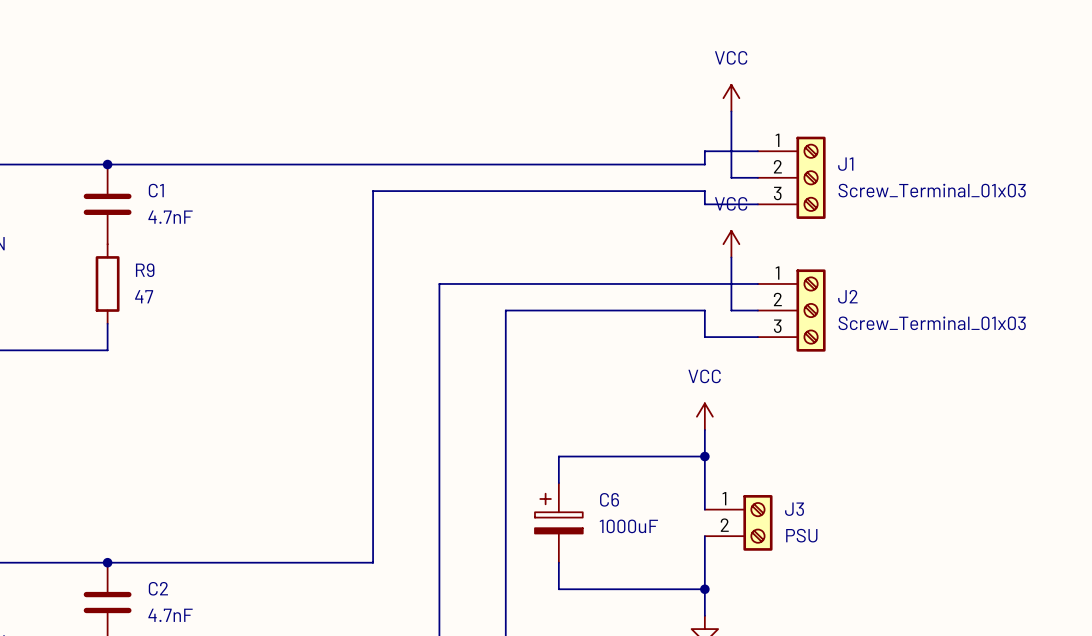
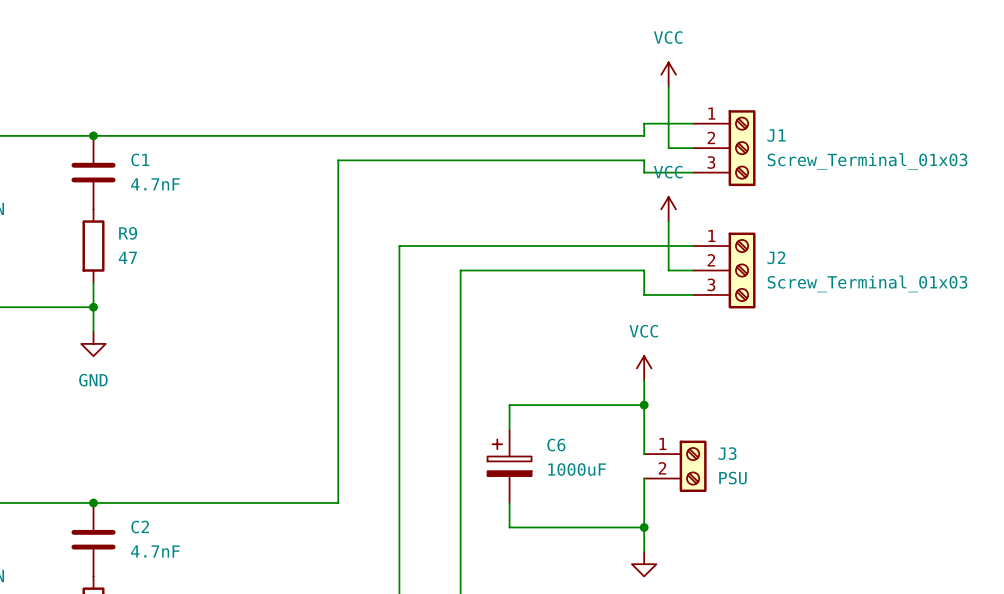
wire: none -> (93, 307) (93, 331)
junction: none -> (93, 307)
power symbol: none -> GND (93, 343)

